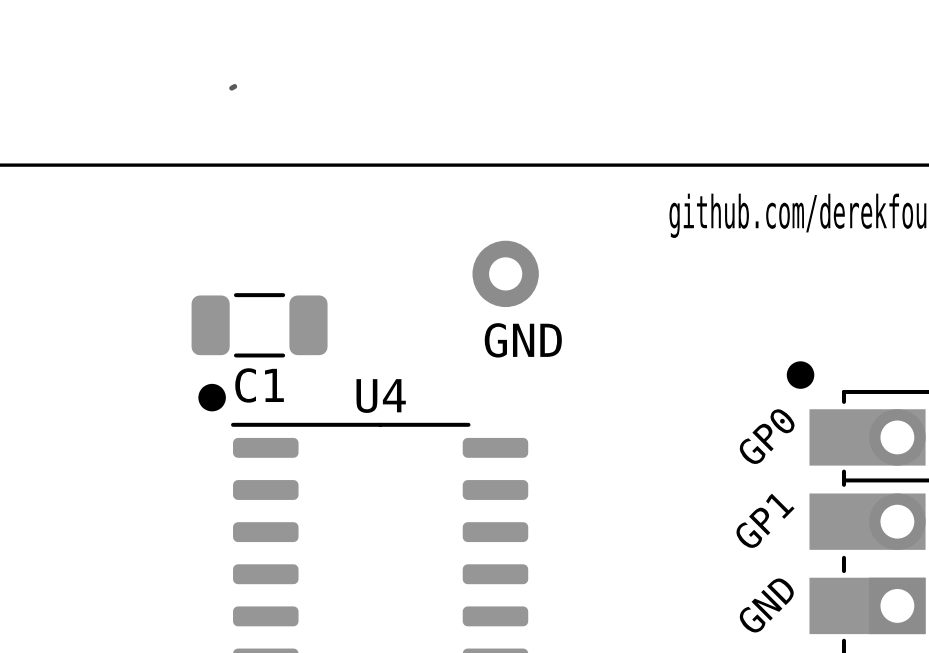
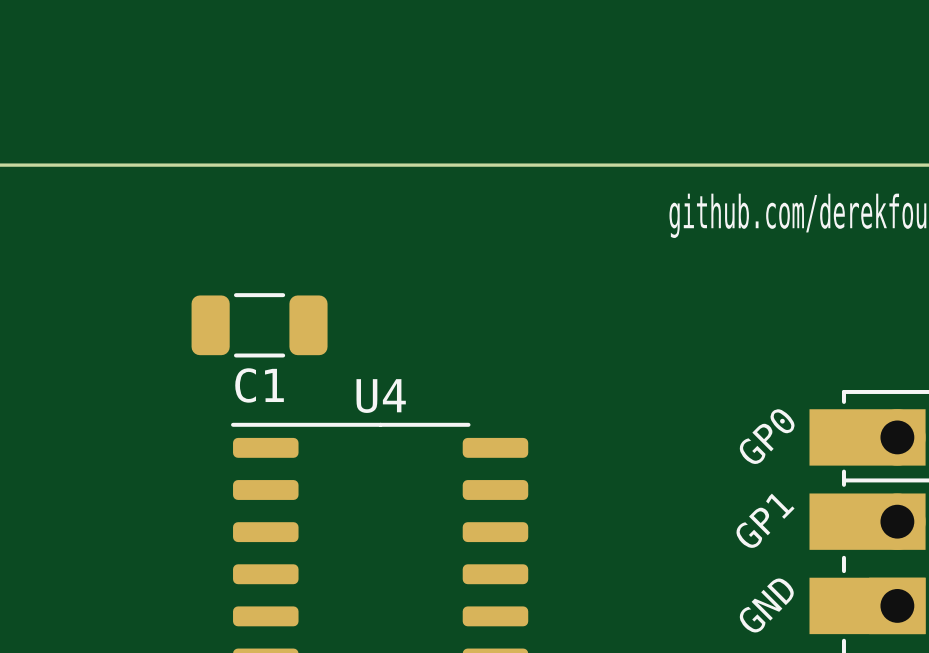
line: (234, 86) (231, 88) -> none
part: (505, 273) -> none
text: GND (523, 340) -> none
drawing: [786, 361, 815, 389] -> none
drawing: [198, 383, 226, 412] -> none

